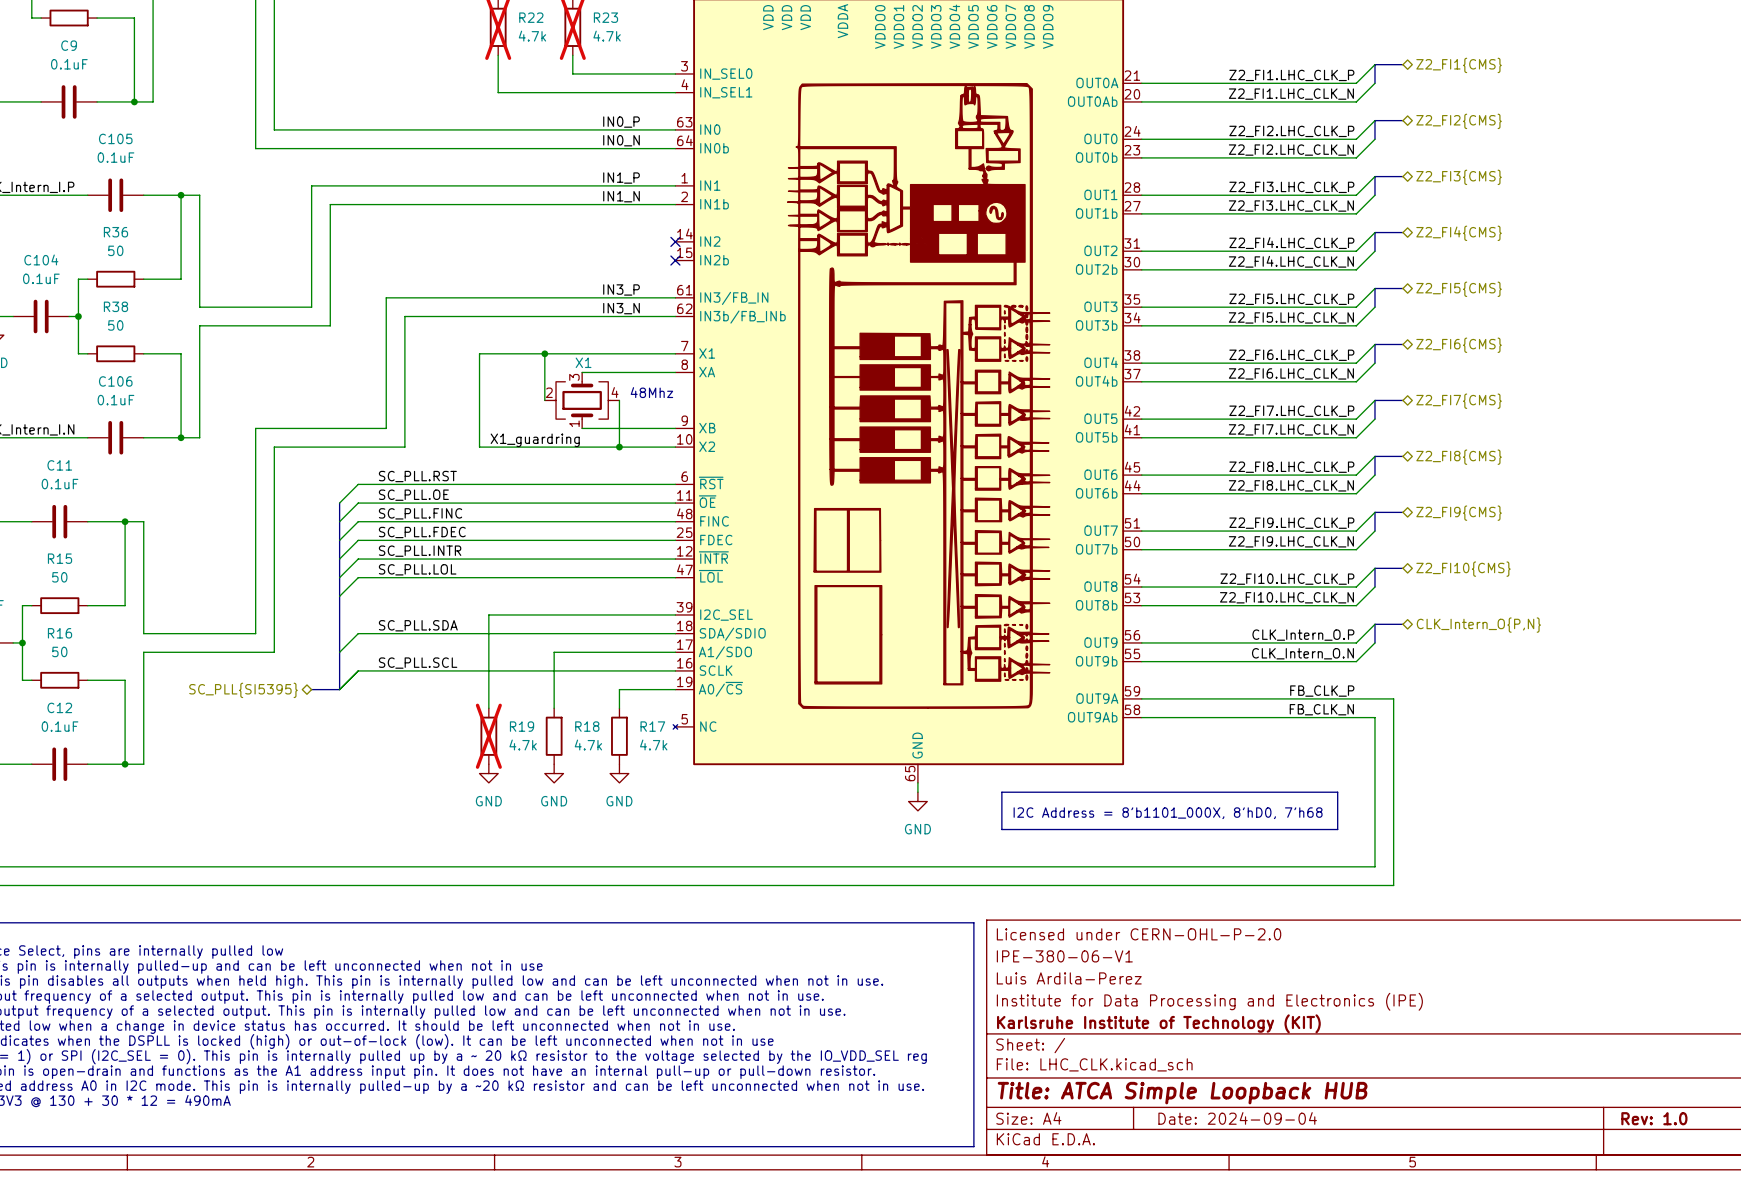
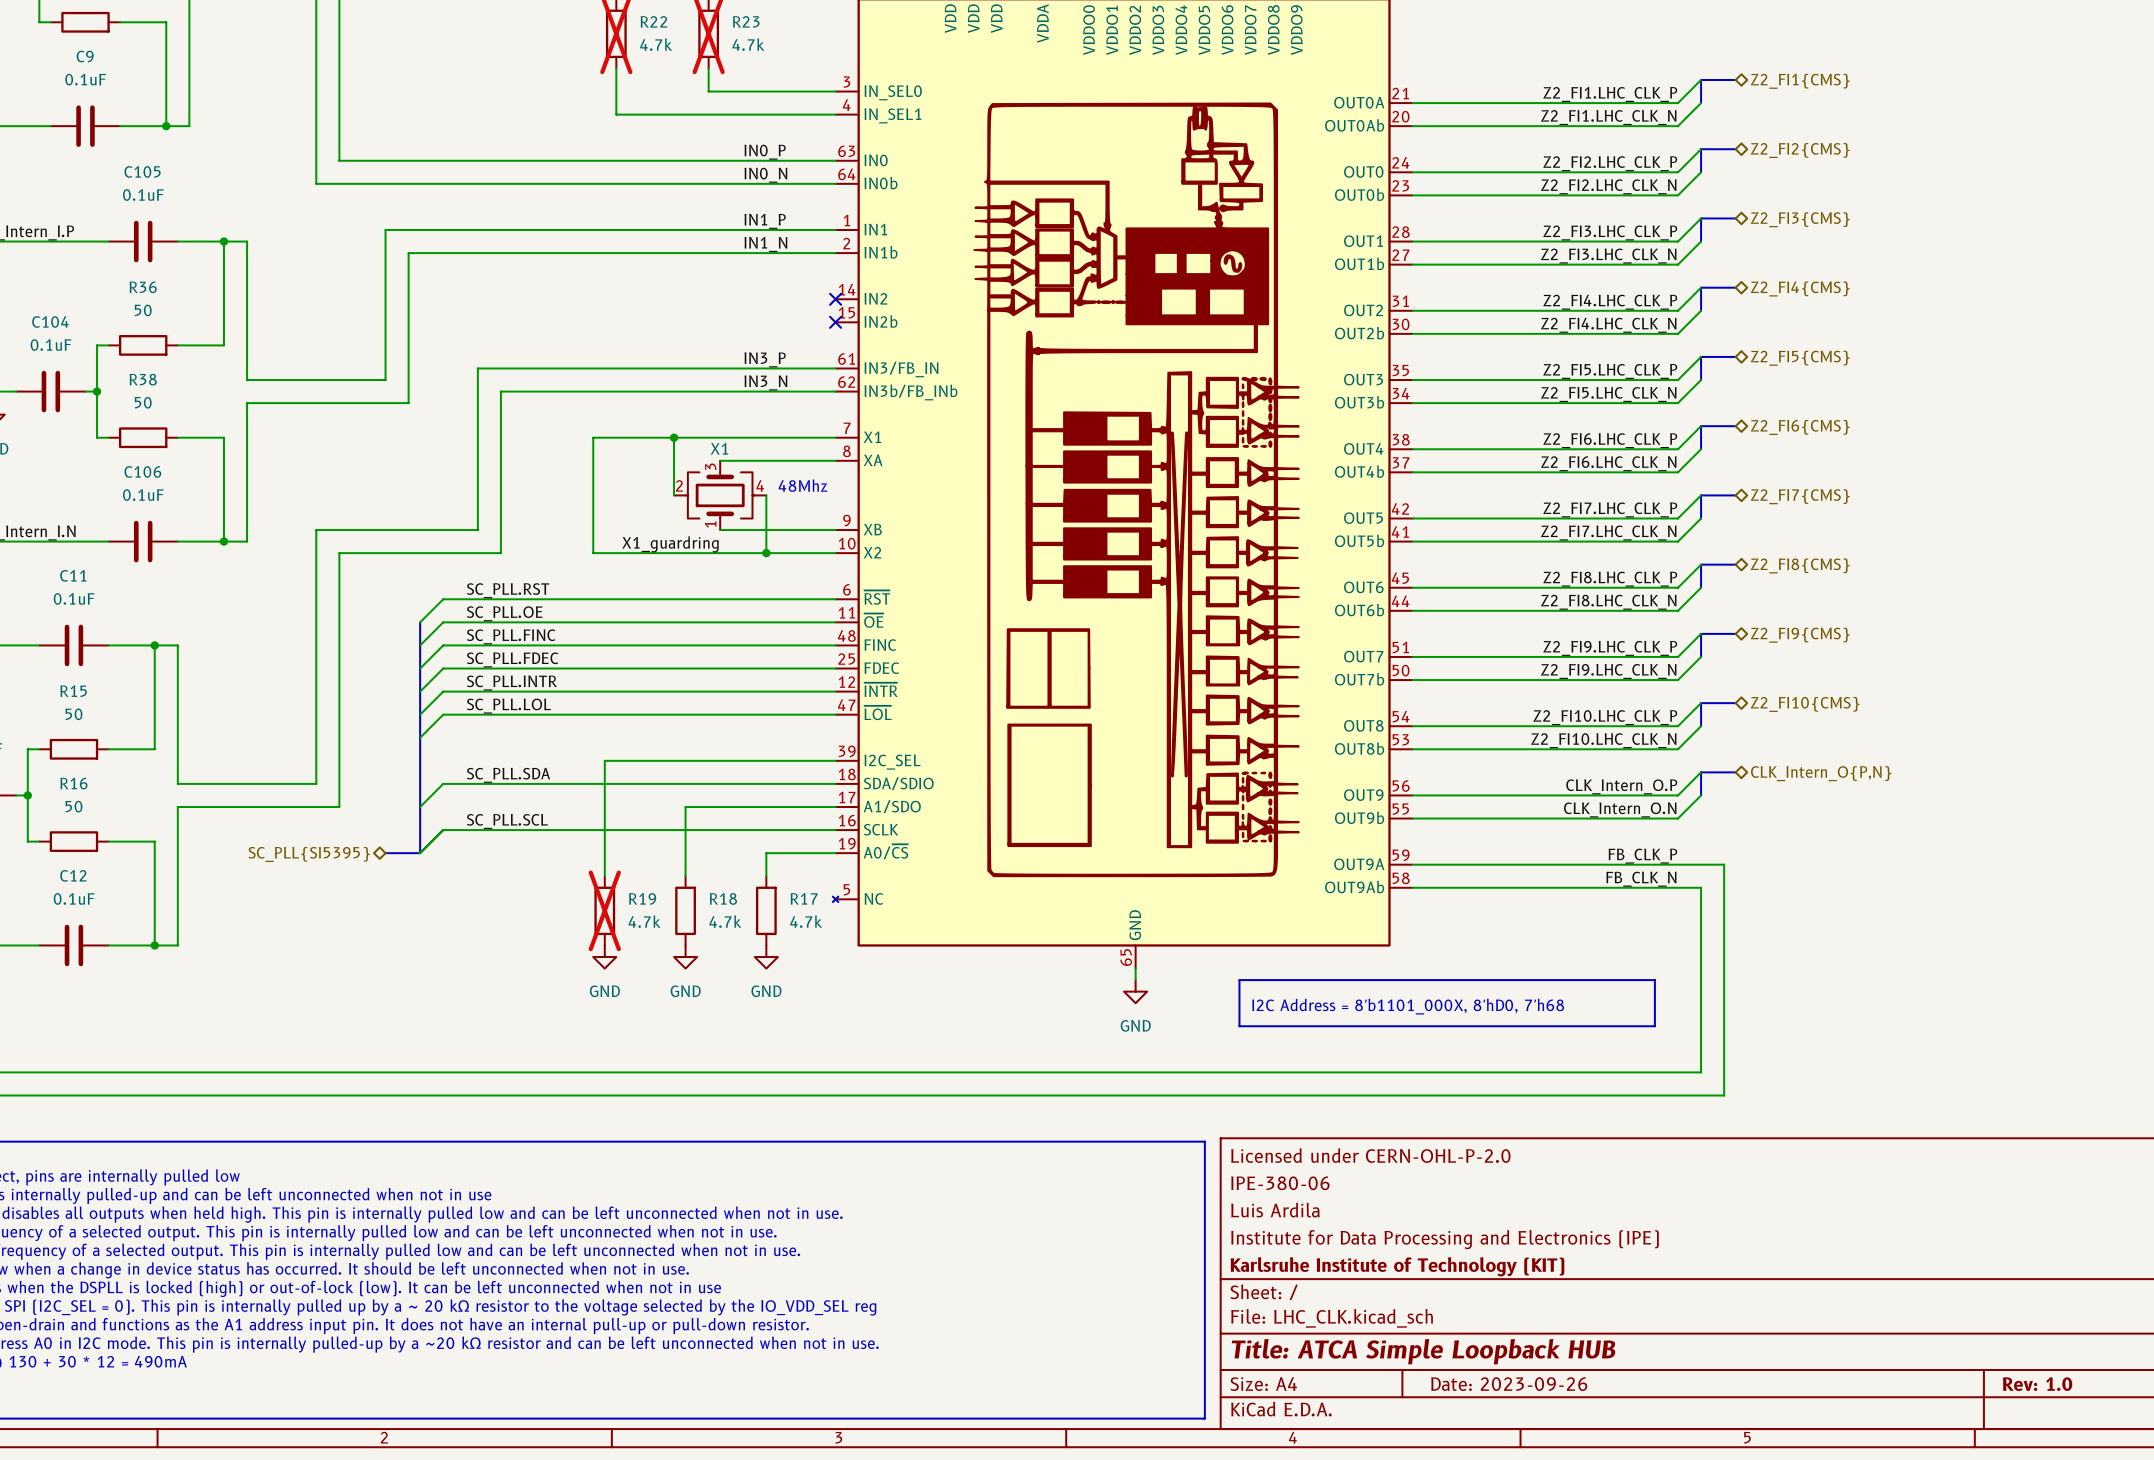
title block: IPE-380-06-V1 (1064, 956) -> IPE-380-06 (1280, 1183)
title block: Luis Ardila-Perez (1069, 978) -> Luis Ardila (1275, 1210)
title block: Date: 2024-09-04 (1237, 1118) -> Date: 2023-09-26 (1509, 1384)

